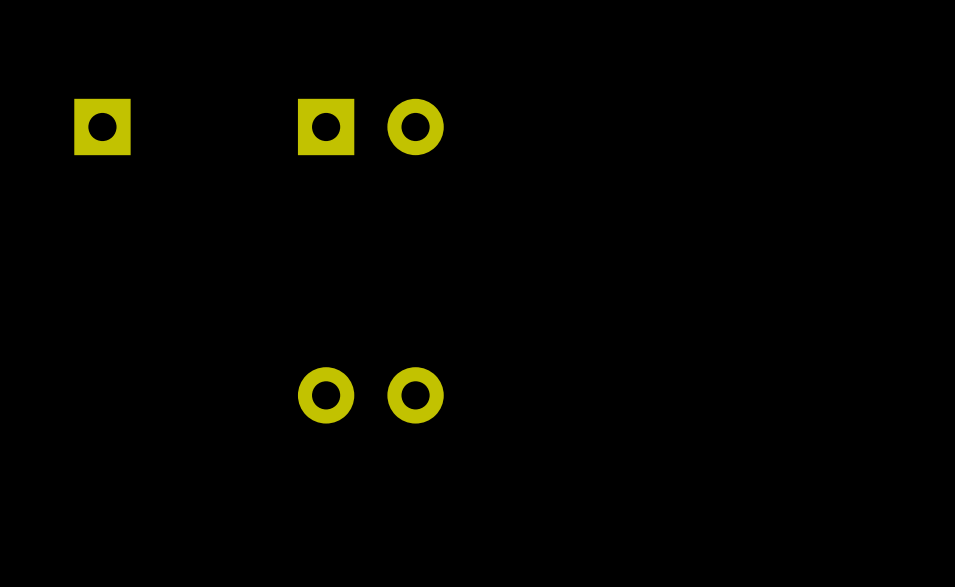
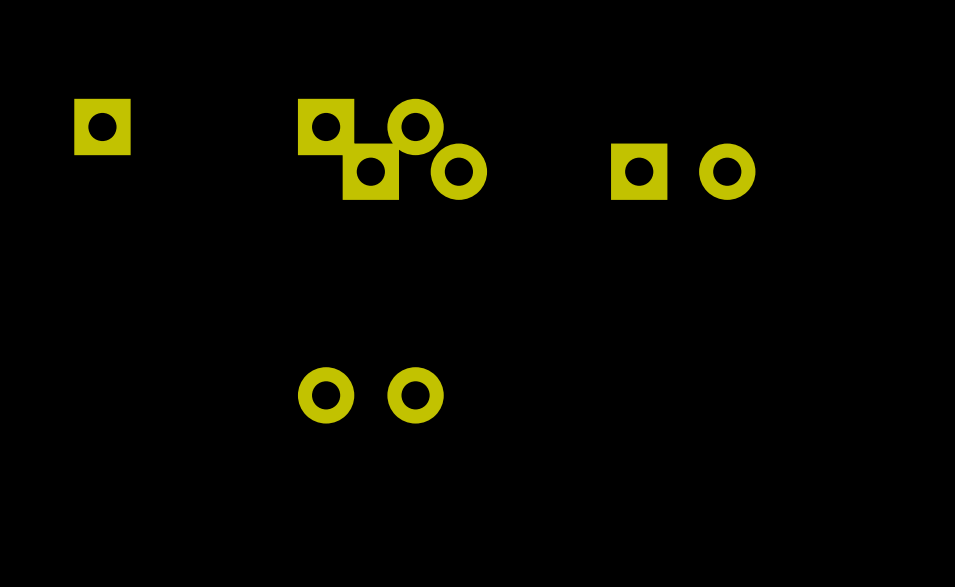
part: none -> (414, 171)
part: none -> (683, 171)

